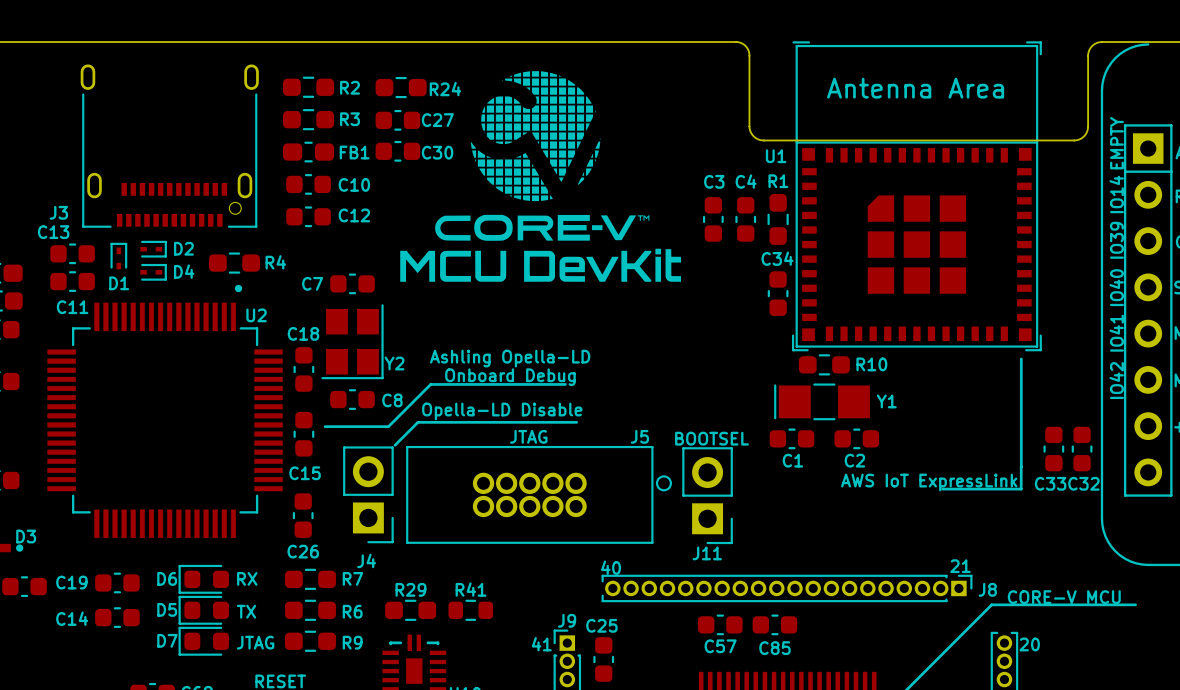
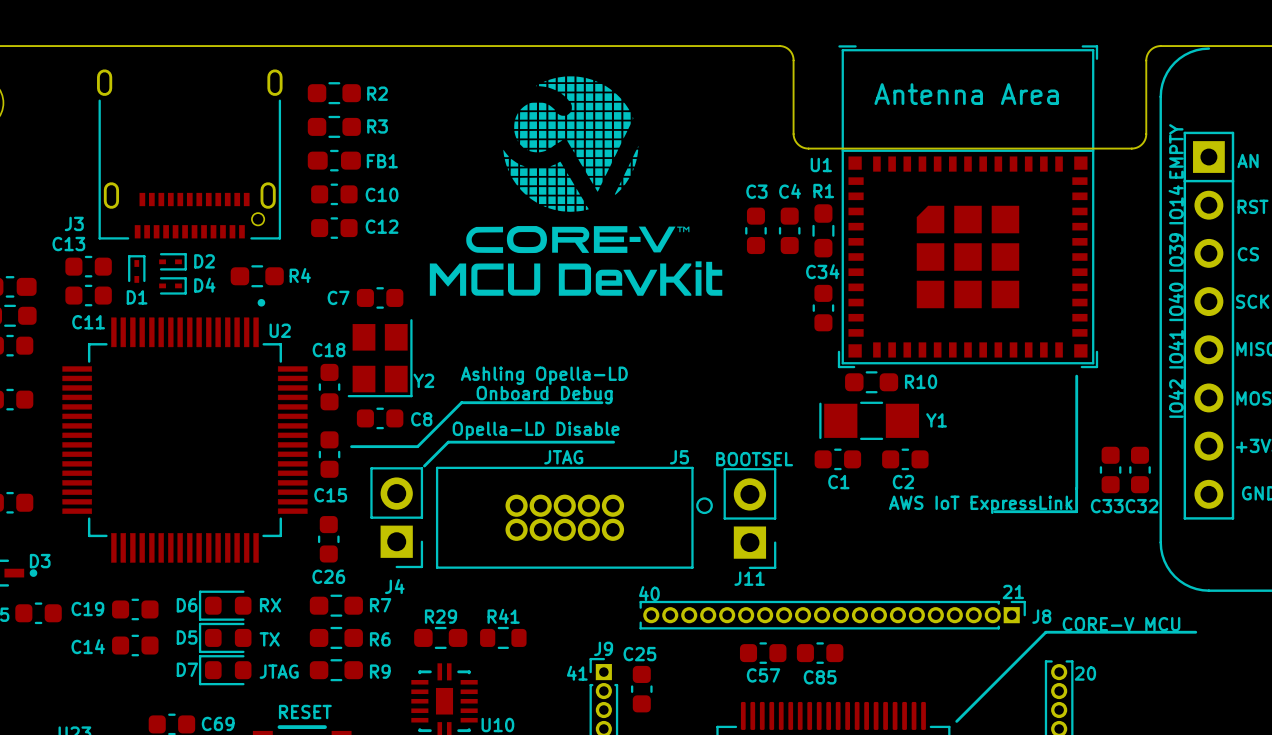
R24: (401, 87) -> none
C27: (397, 120) -> none
C30: (397, 151) -> none

